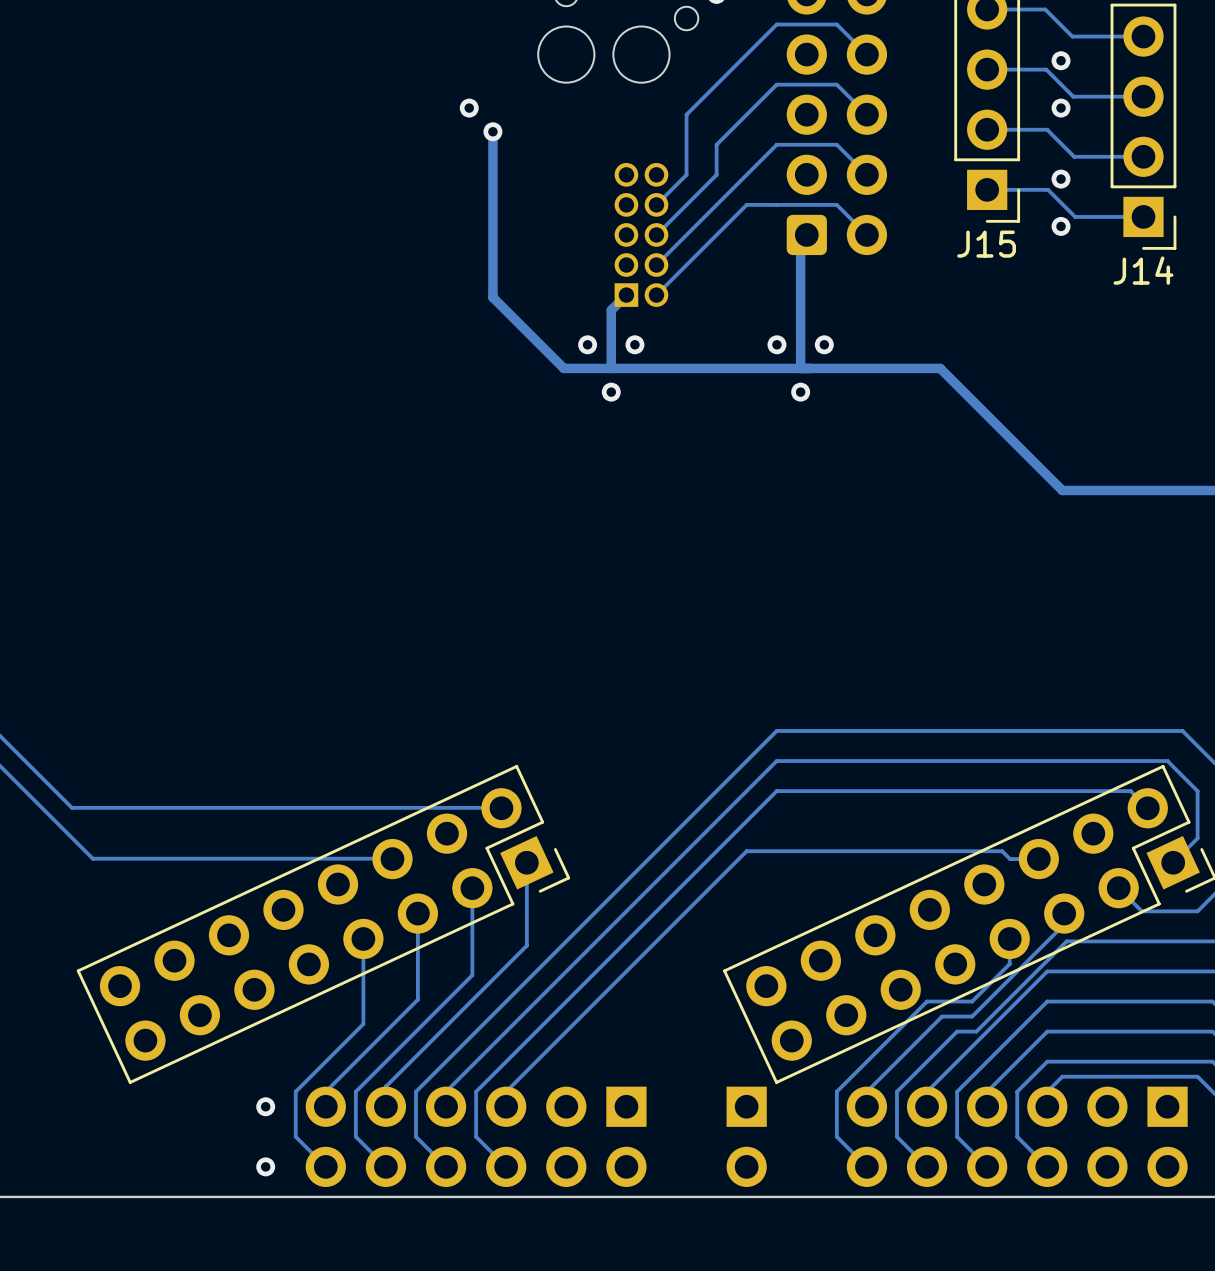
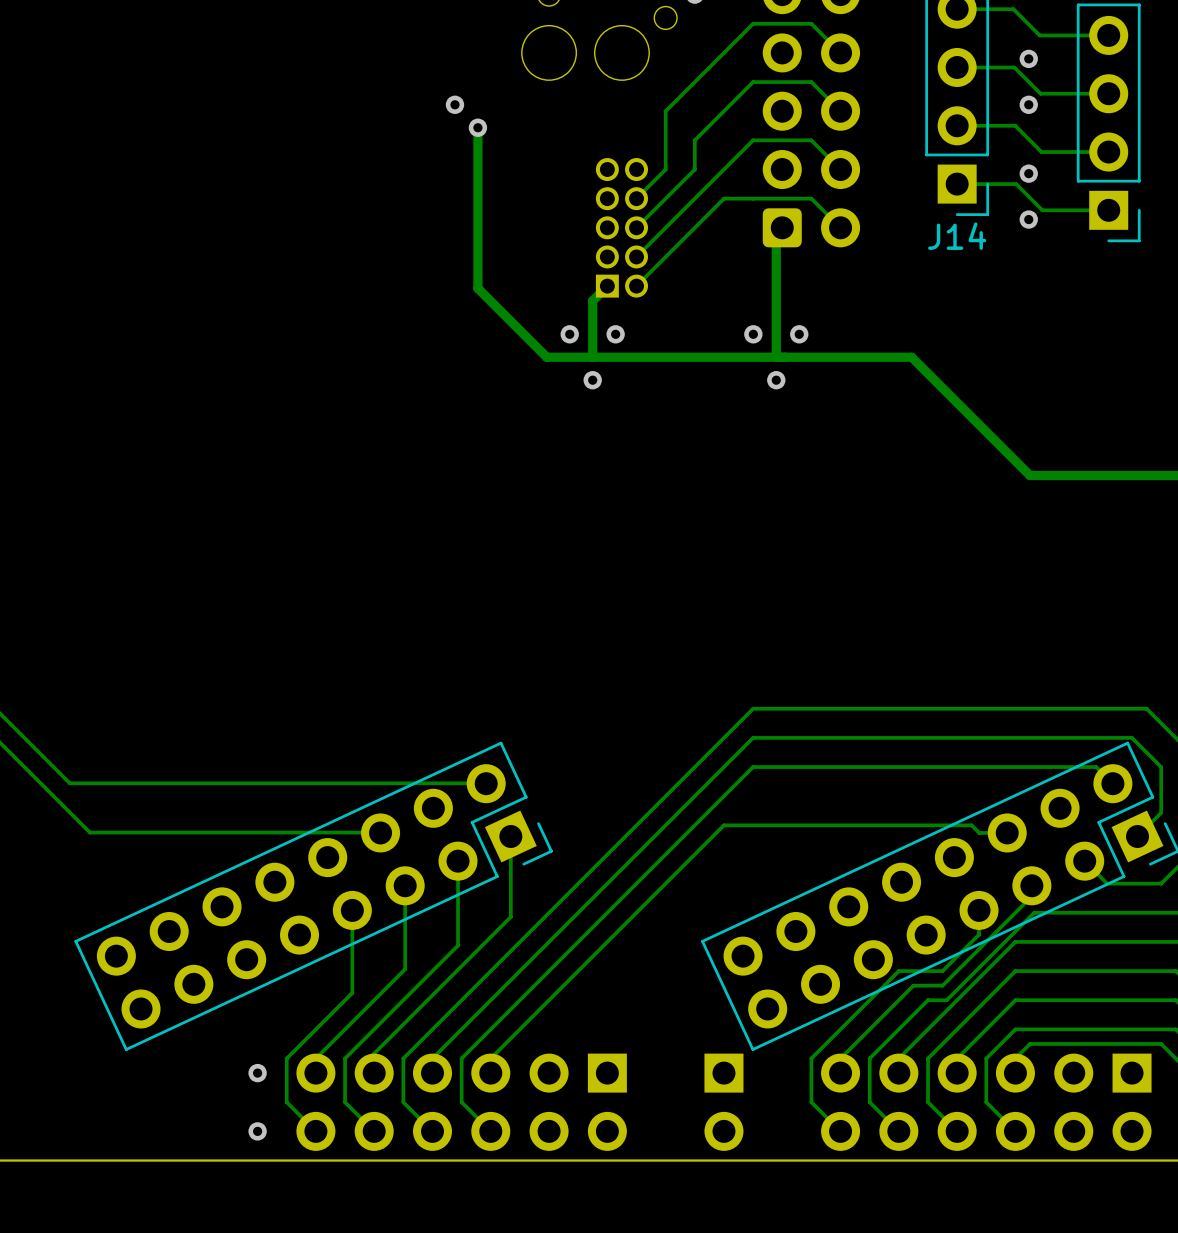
J15 name: J15 (986, 244) -> J14 (957, 236)
J14 name: J14 (1143, 270) -> none

